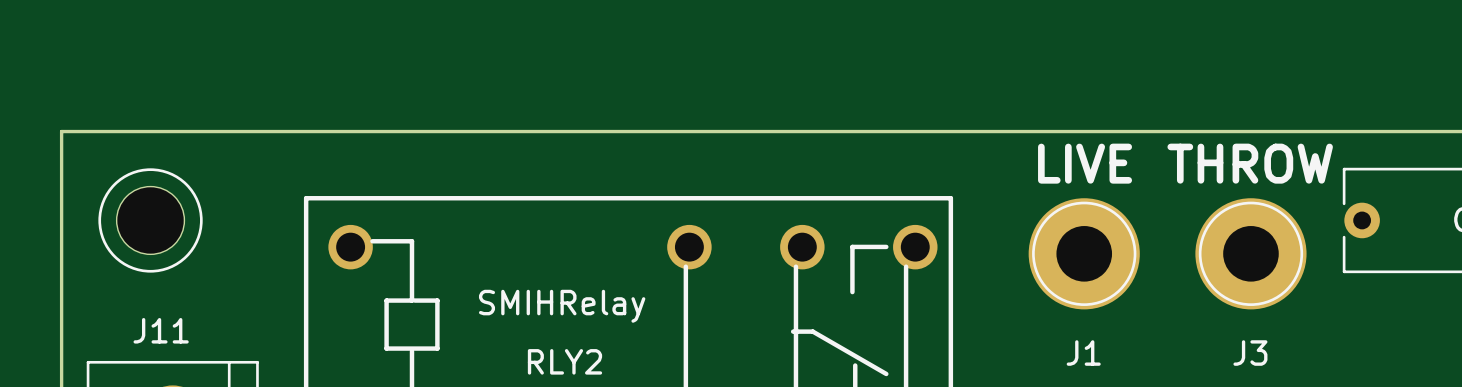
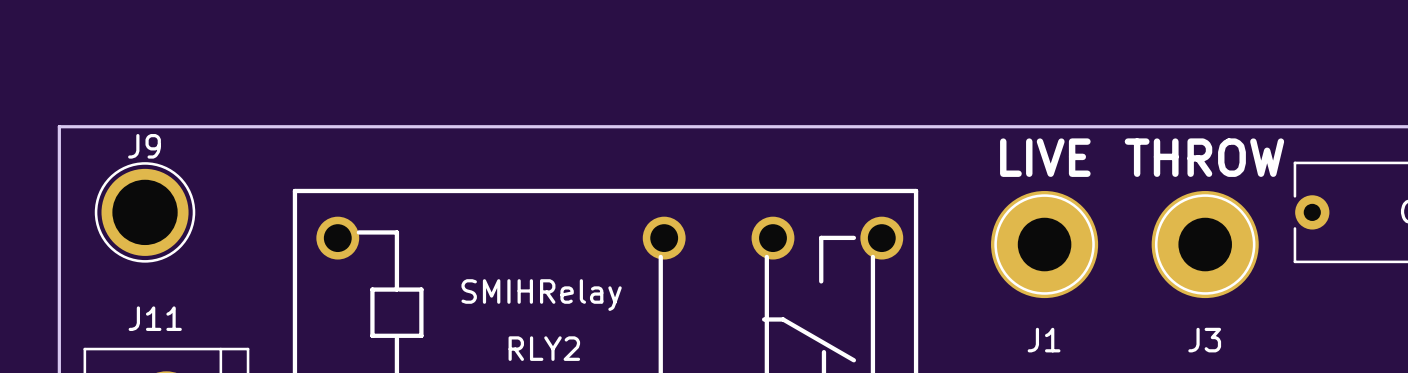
part: (150, 220) -> none
J9: none -> (145, 212)

